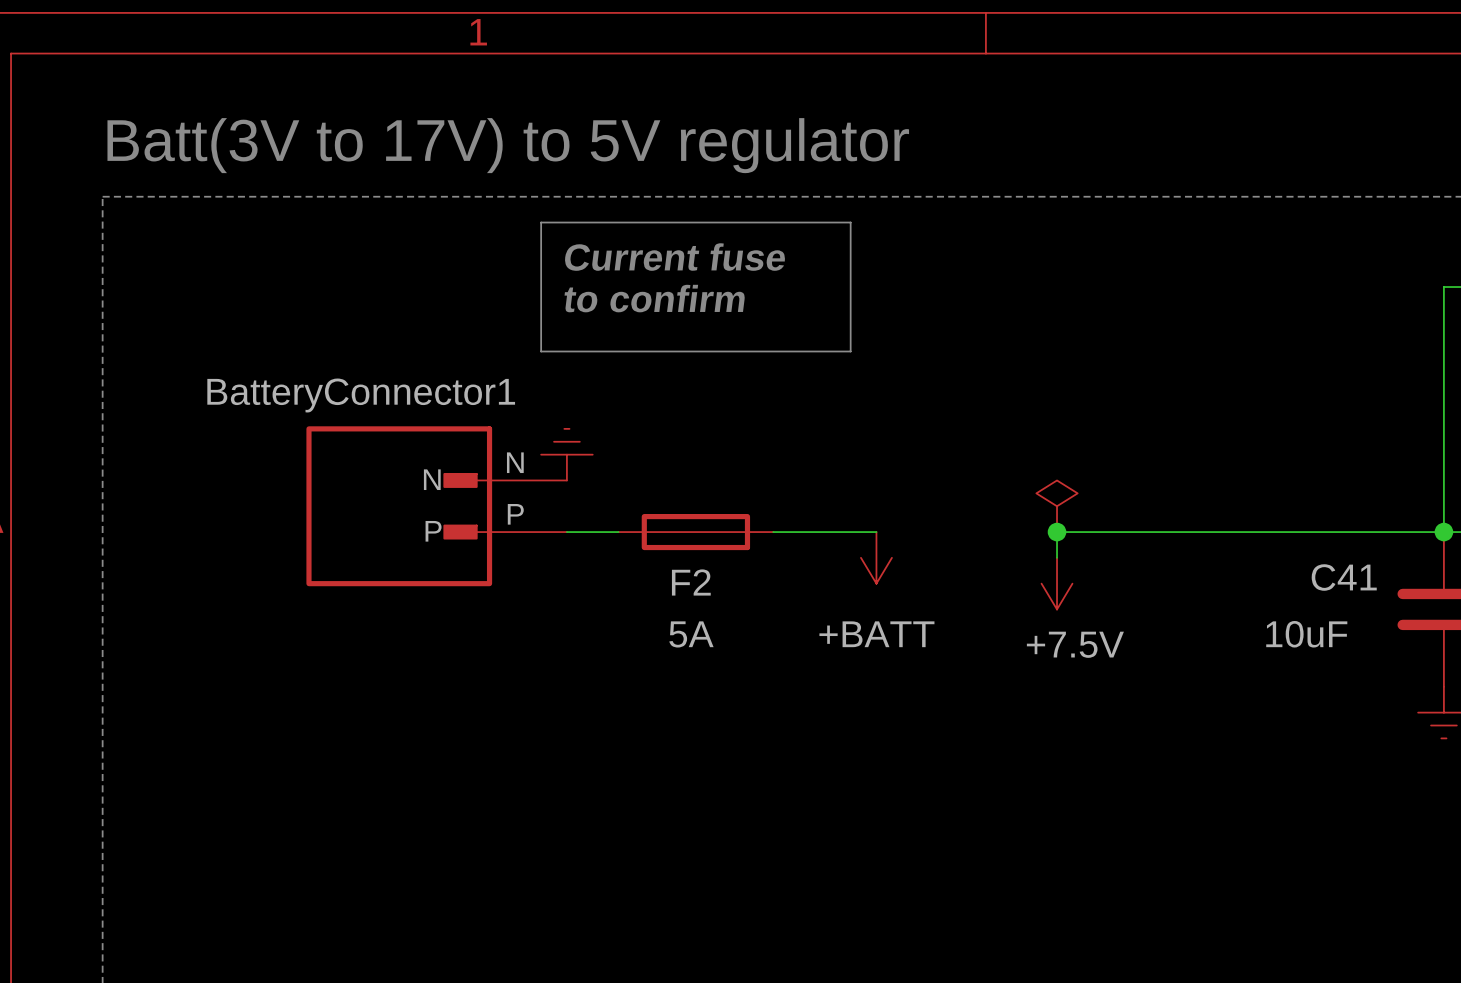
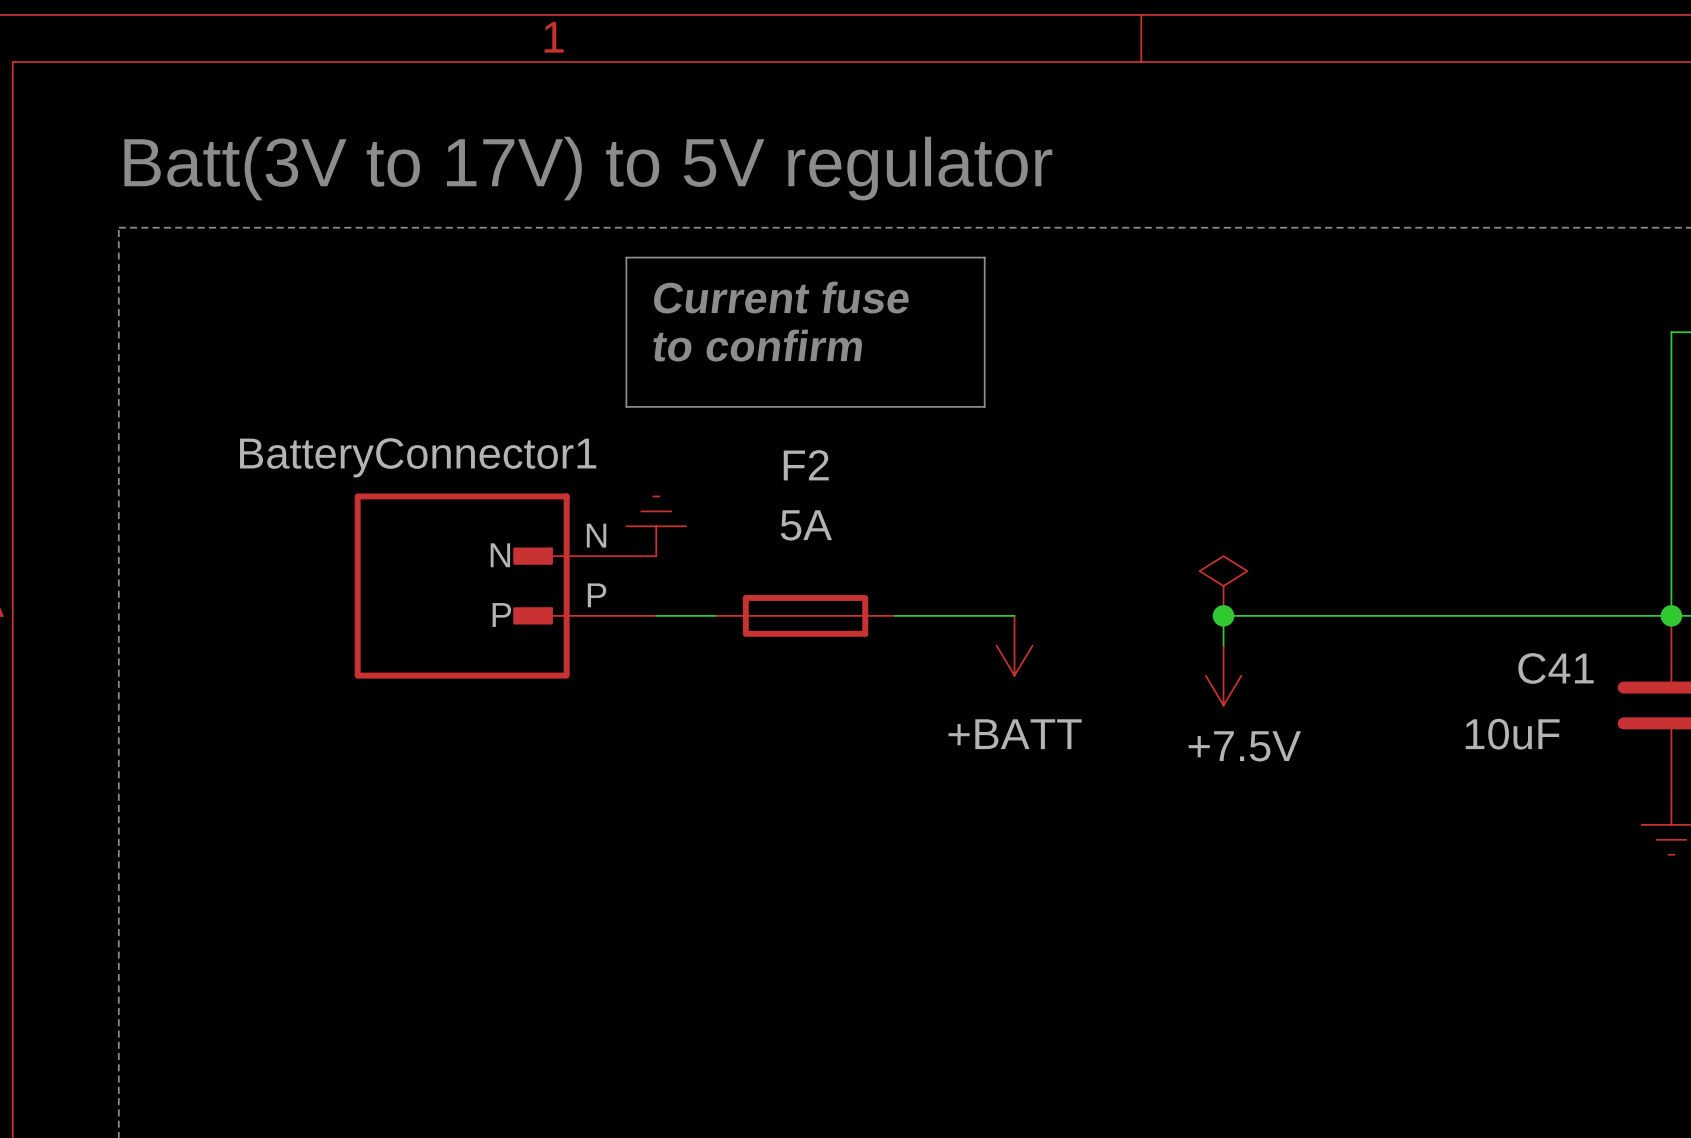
F2 name position: F2 (691, 582) -> F2 (806, 465)
F2 value position: 5A (691, 634) -> 5A (806, 525)

